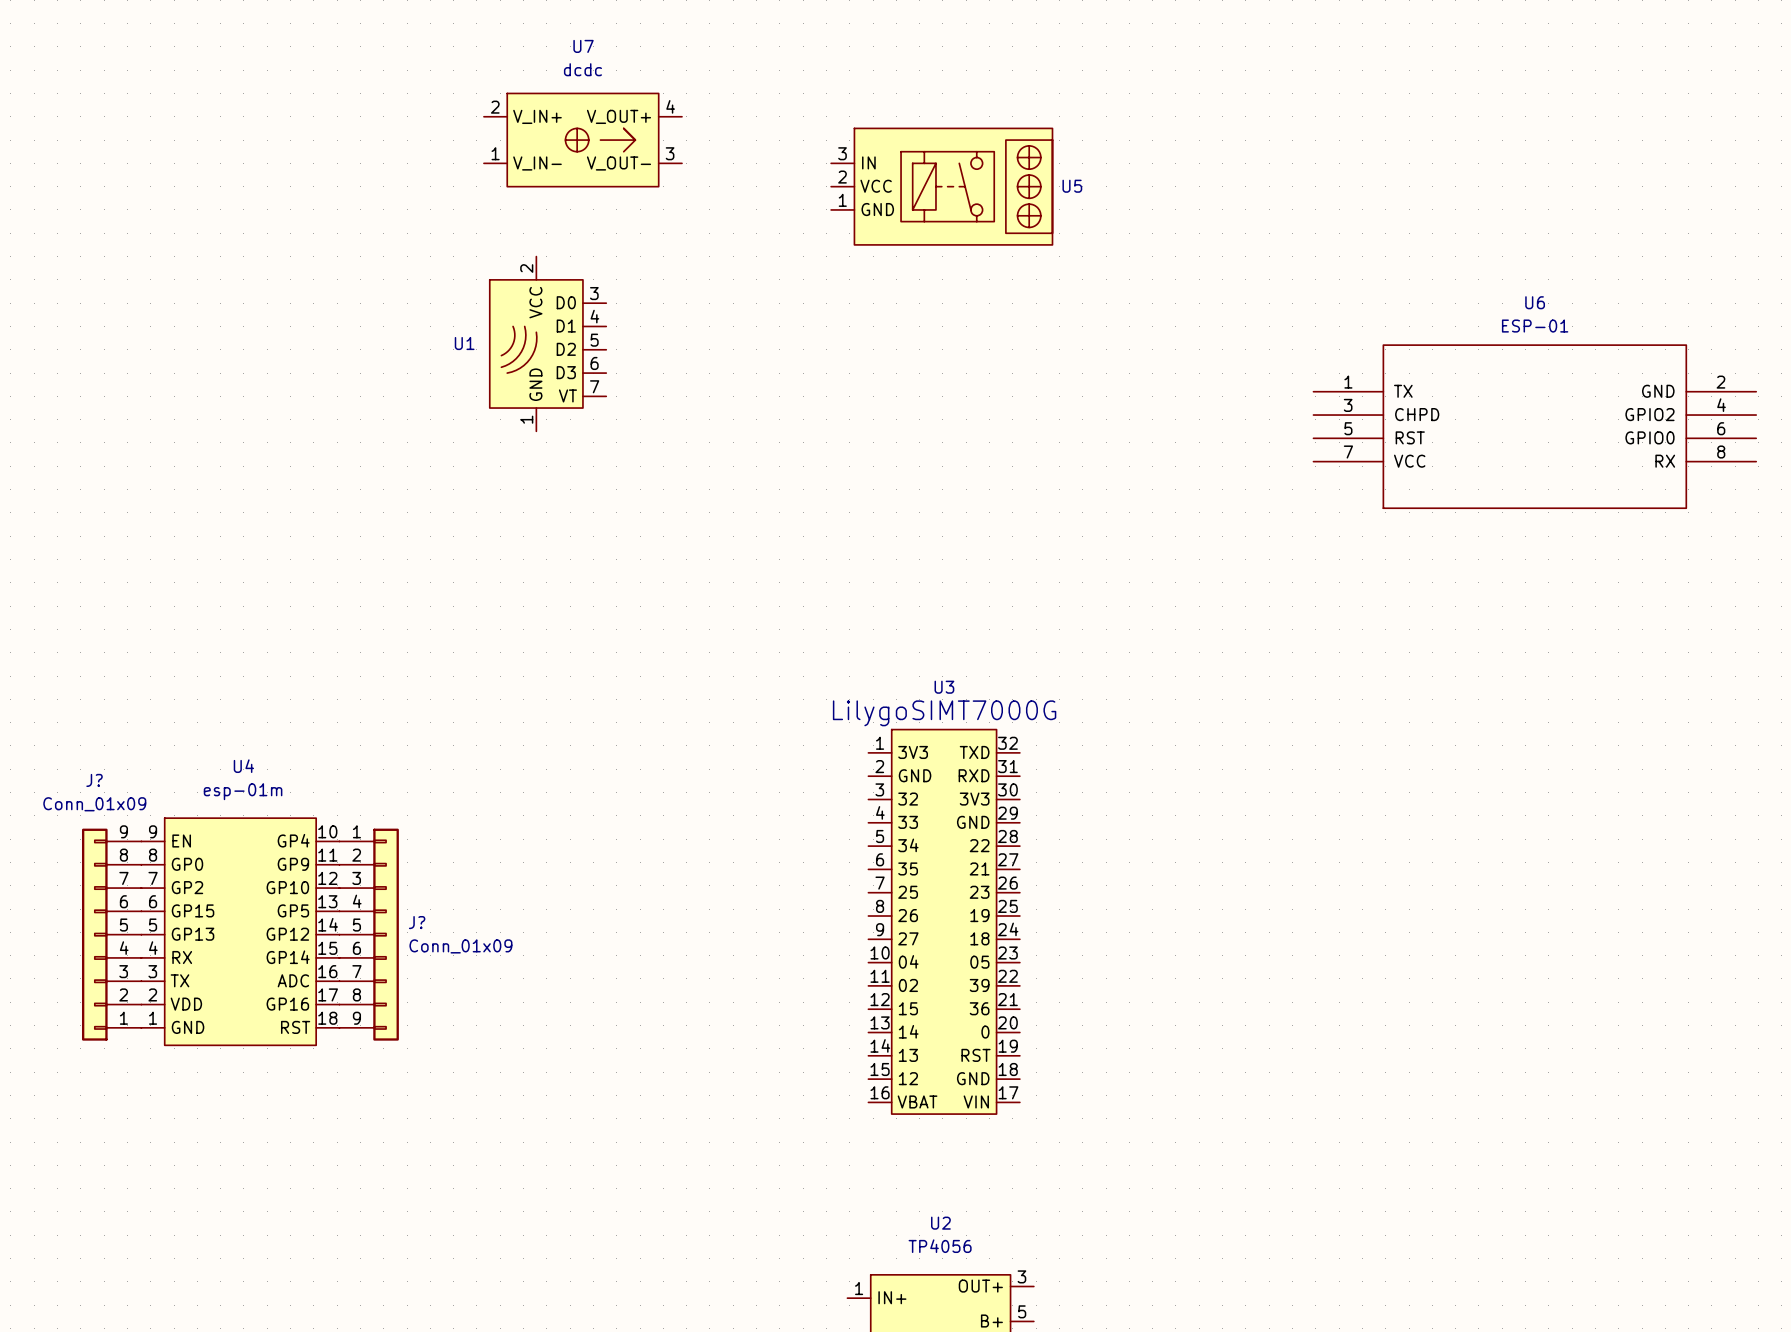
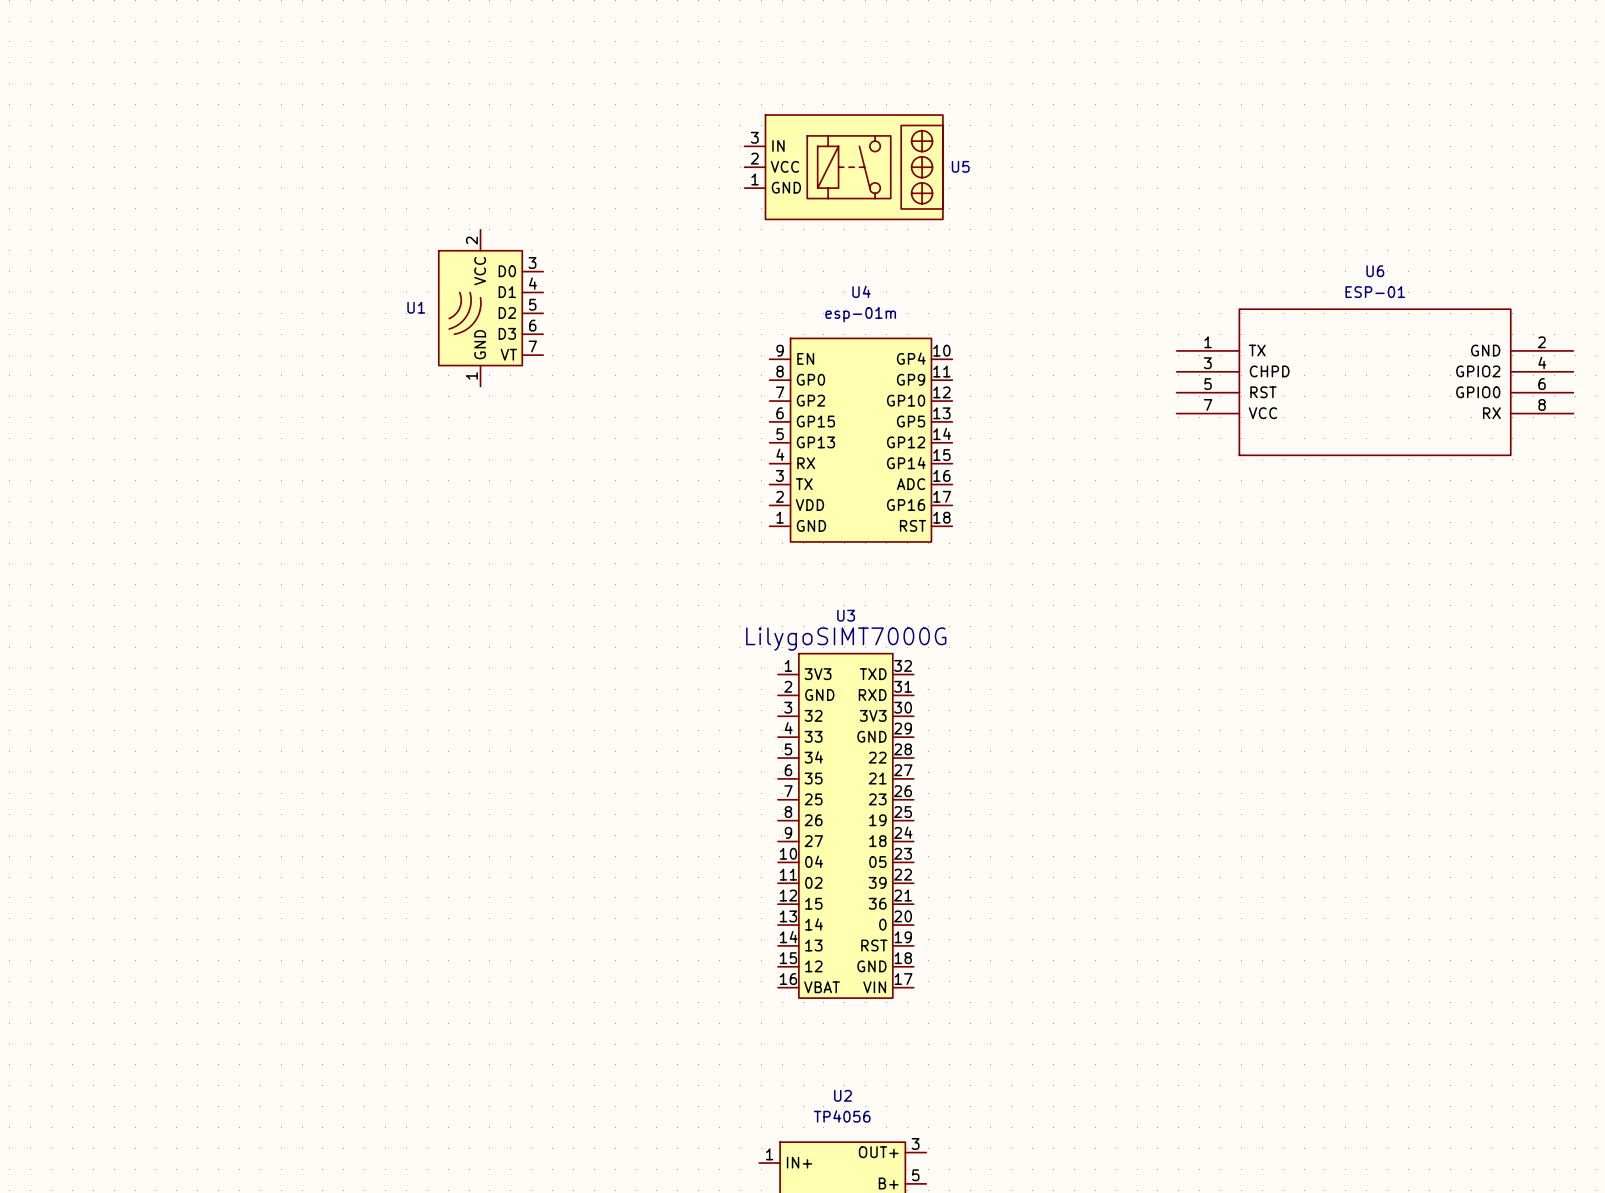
U7: dcdc (582, 140) -> none
U4 symbol: [141, 818, 340, 1046] -> [769, 338, 953, 542]
J?: Conn_01x09 (111, 934) -> none
J?: Conn_01x09 (369, 934) -> none

